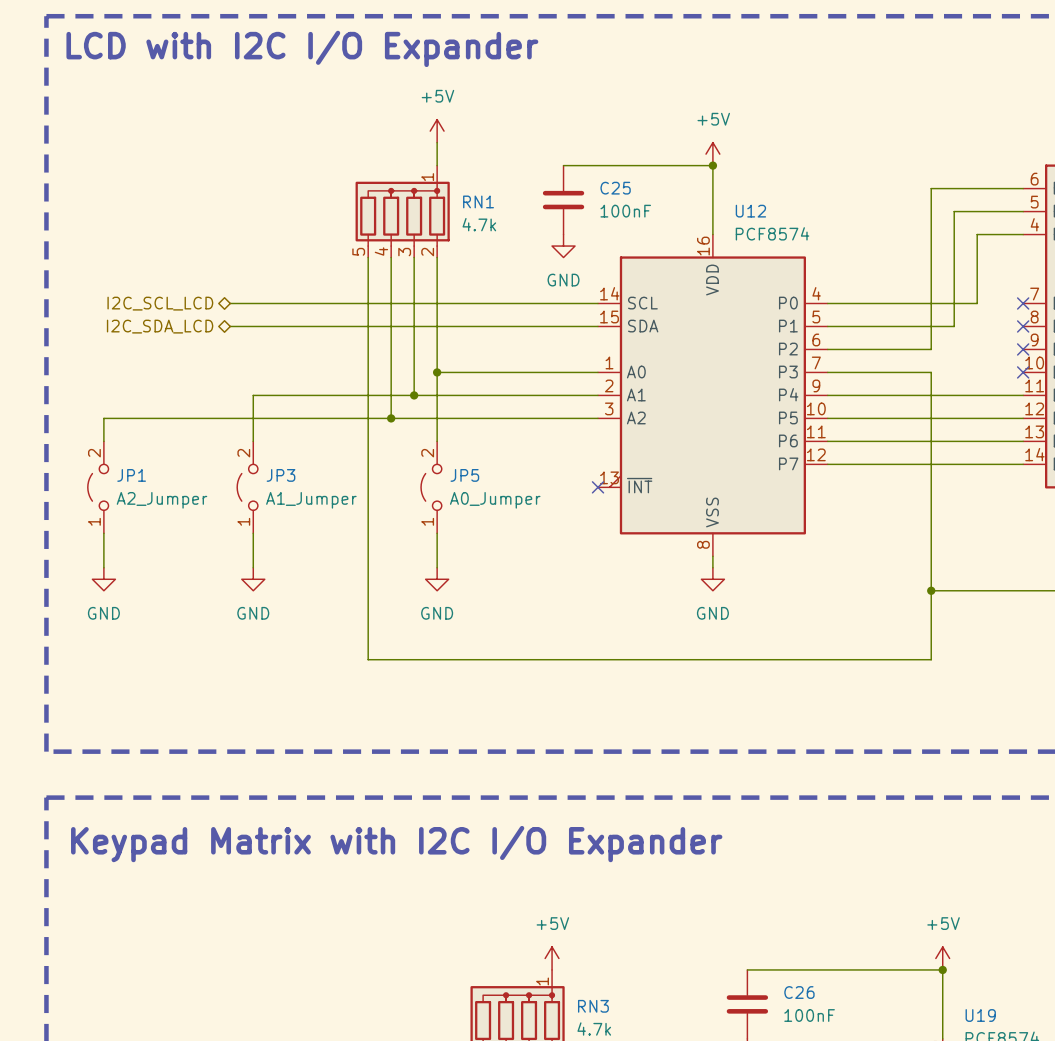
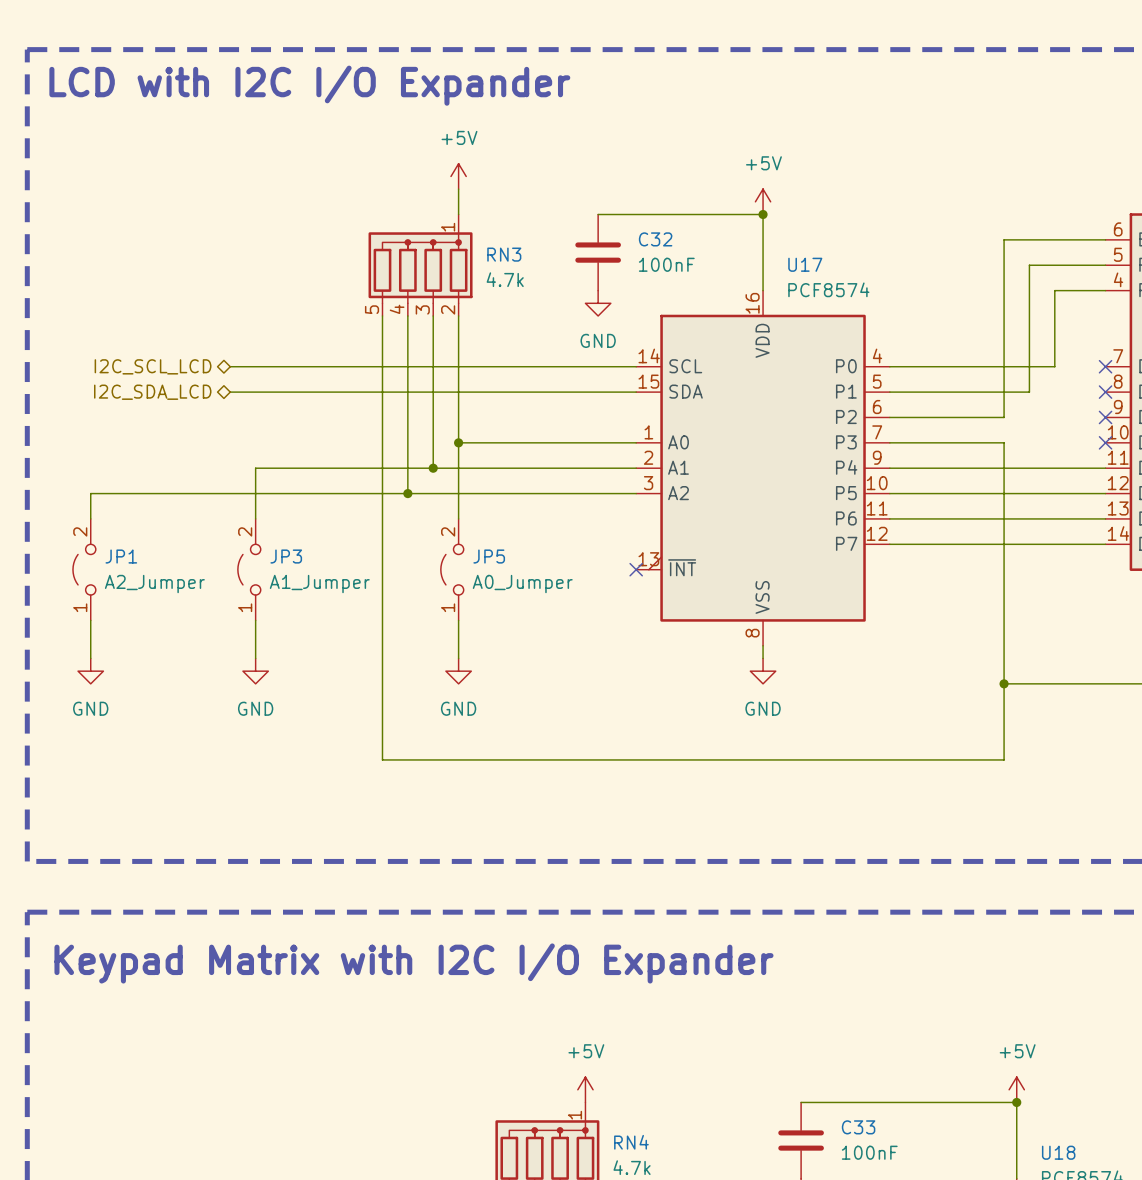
C25 name: C25 (615, 188) -> C32 (655, 239)
RN1 name: RN1 (478, 201) -> RN3 (504, 254)
U12 name: U12 (750, 211) -> U17 (805, 264)
C26 name: C26 (799, 992) -> C33 (858, 1127)
RN3 name: RN3 (593, 1006) -> RN4 (631, 1142)
U19 name: U19 (980, 1015) -> U18 (1058, 1152)

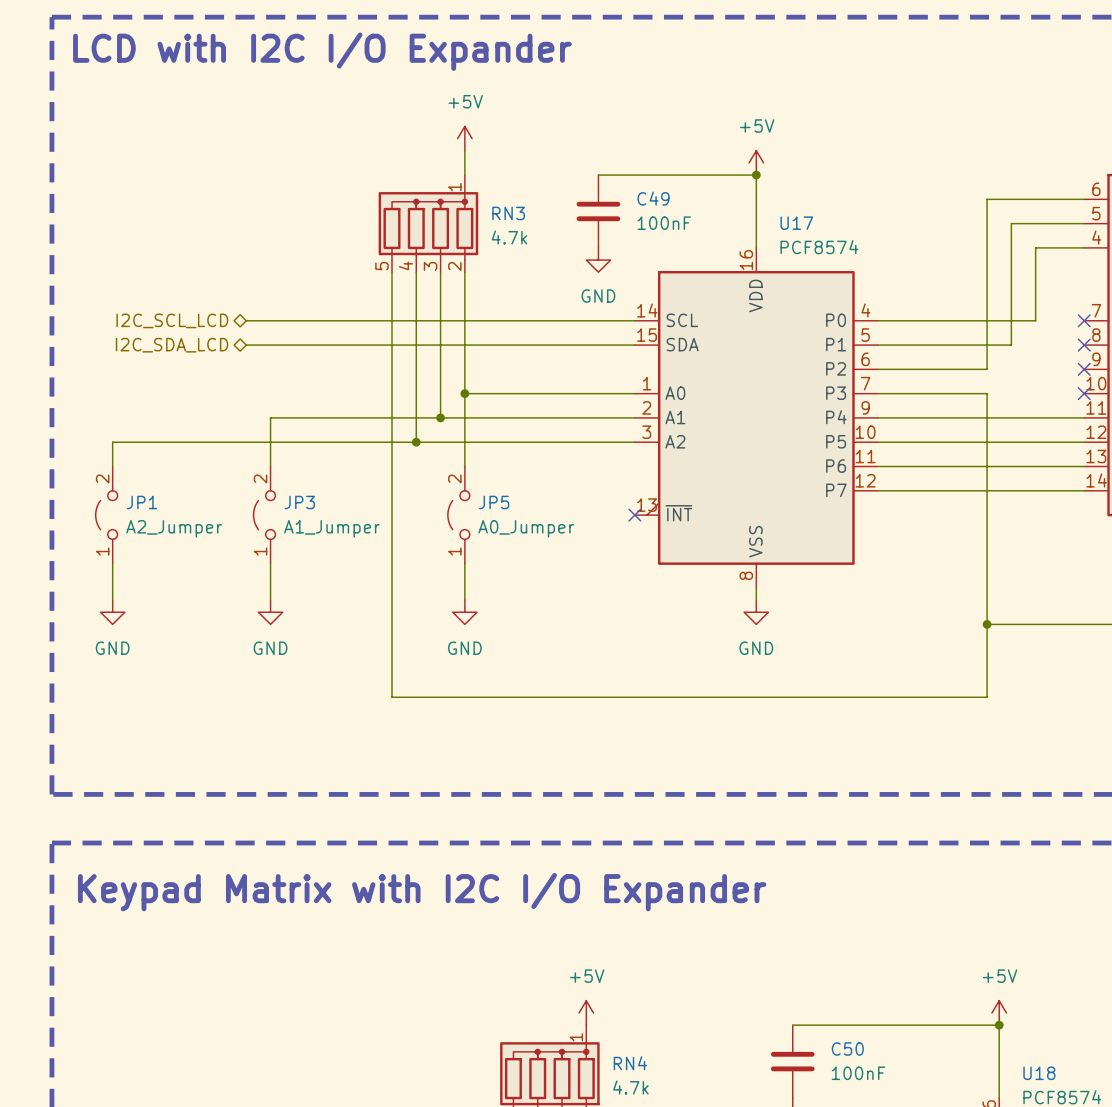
C32 name: C32 (655, 239) -> C49 (653, 198)
C33 name: C33 (858, 1127) -> C50 (847, 1048)

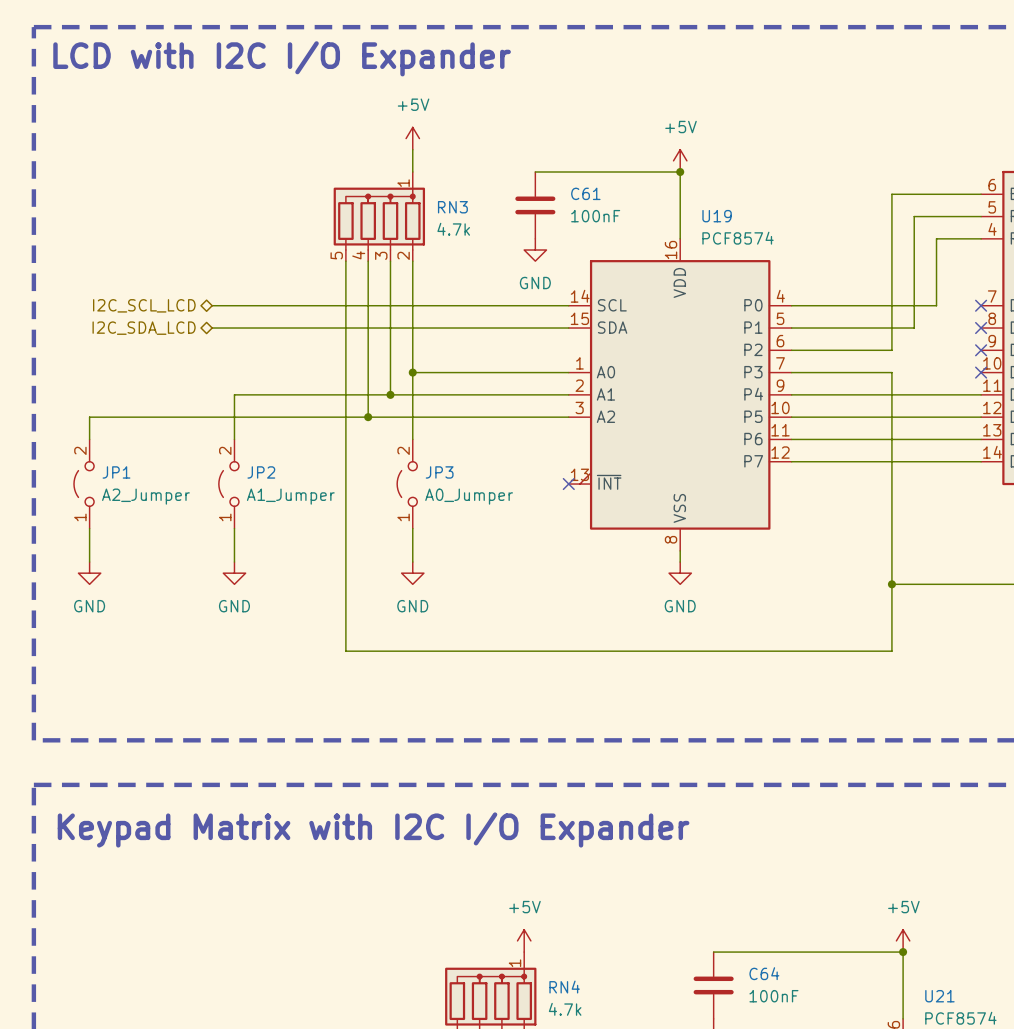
C49 name: C49 (653, 198) -> C61 (585, 193)
U17 name: U17 (796, 223) -> U19 (717, 216)
JP3 name: JP3 (299, 502) -> JP2 (261, 472)
JP5 name: JP5 (494, 502) -> JP3 (439, 472)
C50 name: C50 (847, 1048) -> C64 (764, 973)
U18 name: U18 (1039, 1073) -> U21 (939, 996)

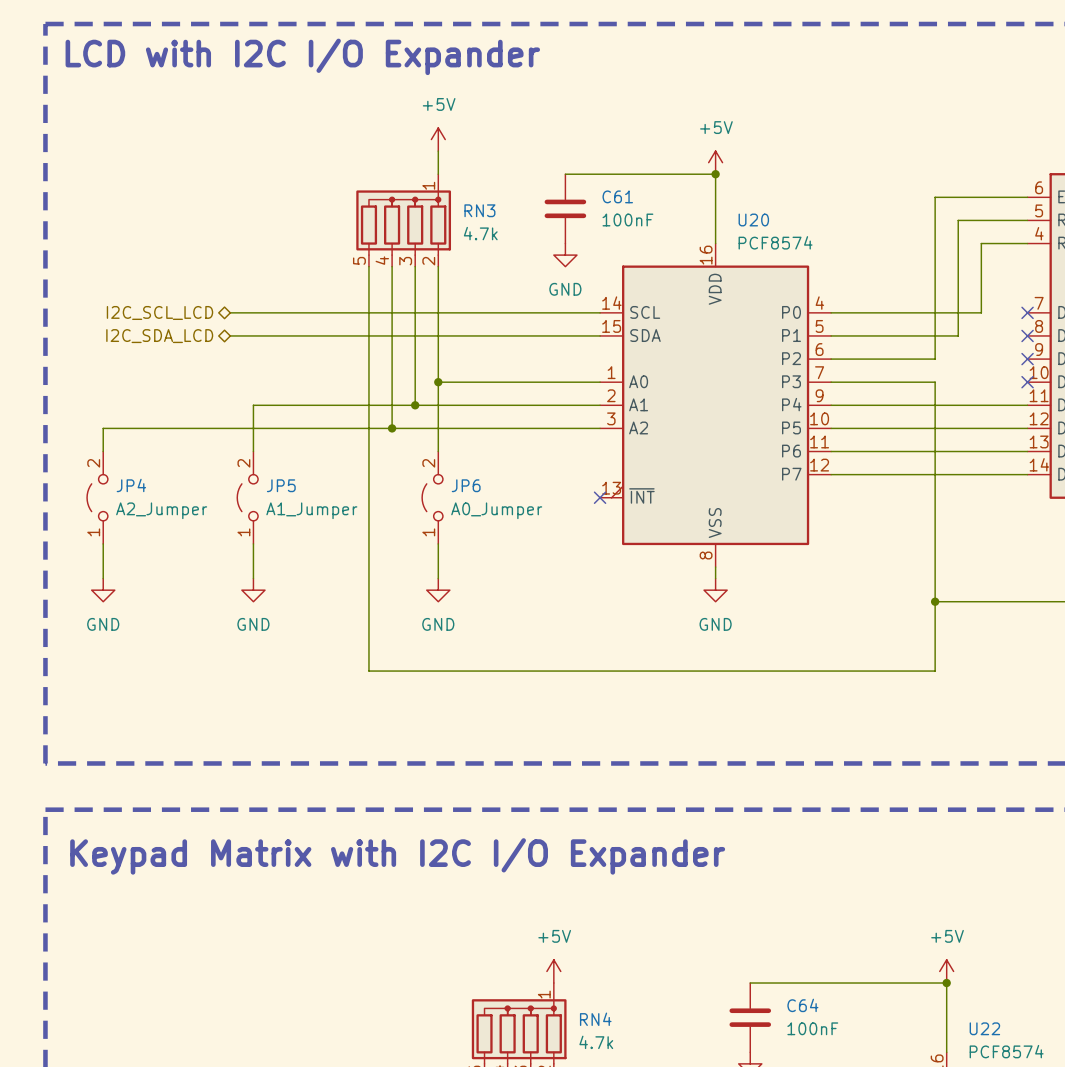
U19 name: U19 (717, 216) -> U20 (753, 220)
JP1 name: JP1 (116, 472) -> JP4 (131, 485)
JP2 name: JP2 (261, 472) -> JP5 (281, 485)
JP3 name: JP3 (439, 472) -> JP6 (466, 485)
U21 name: U21 (939, 996) -> U22 (984, 1028)

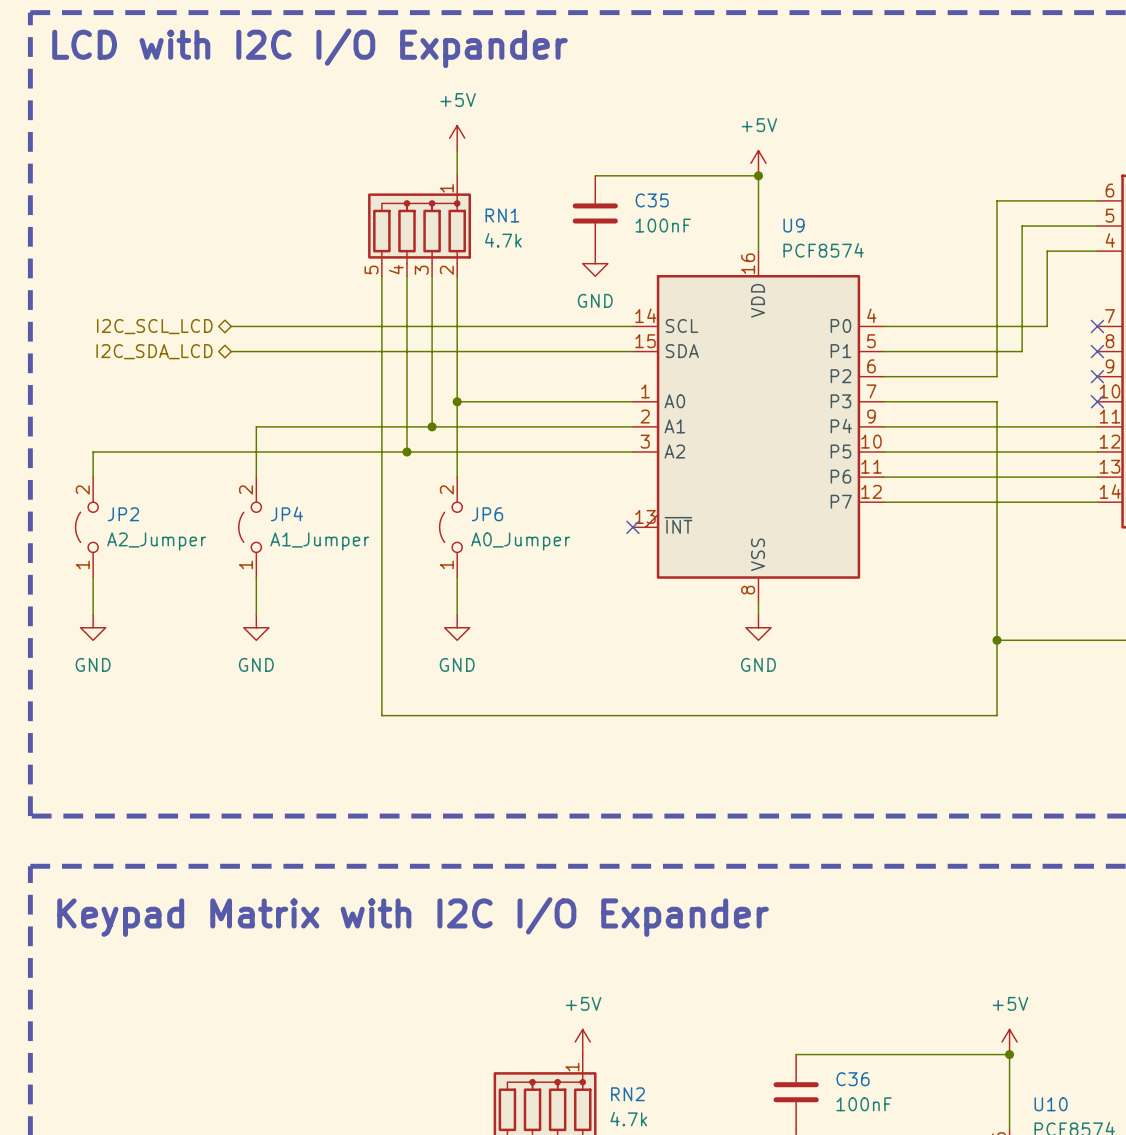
C61 name: C61 (617, 196) -> C35 (652, 200)
RN3 name: RN3 (479, 210) -> RN1 (502, 215)
U20 name: U20 (753, 220) -> U9 (794, 225)
JP4 name: JP4 (131, 485) -> JP2 (123, 514)
JP5 name: JP5 (281, 485) -> JP4 (286, 513)
C64 name: C64 (802, 1005) -> C36 (853, 1079)
RN4 name: RN4 (595, 1019) -> RN2 (627, 1094)
U22 name: U22 (984, 1028) -> U10 (1051, 1104)

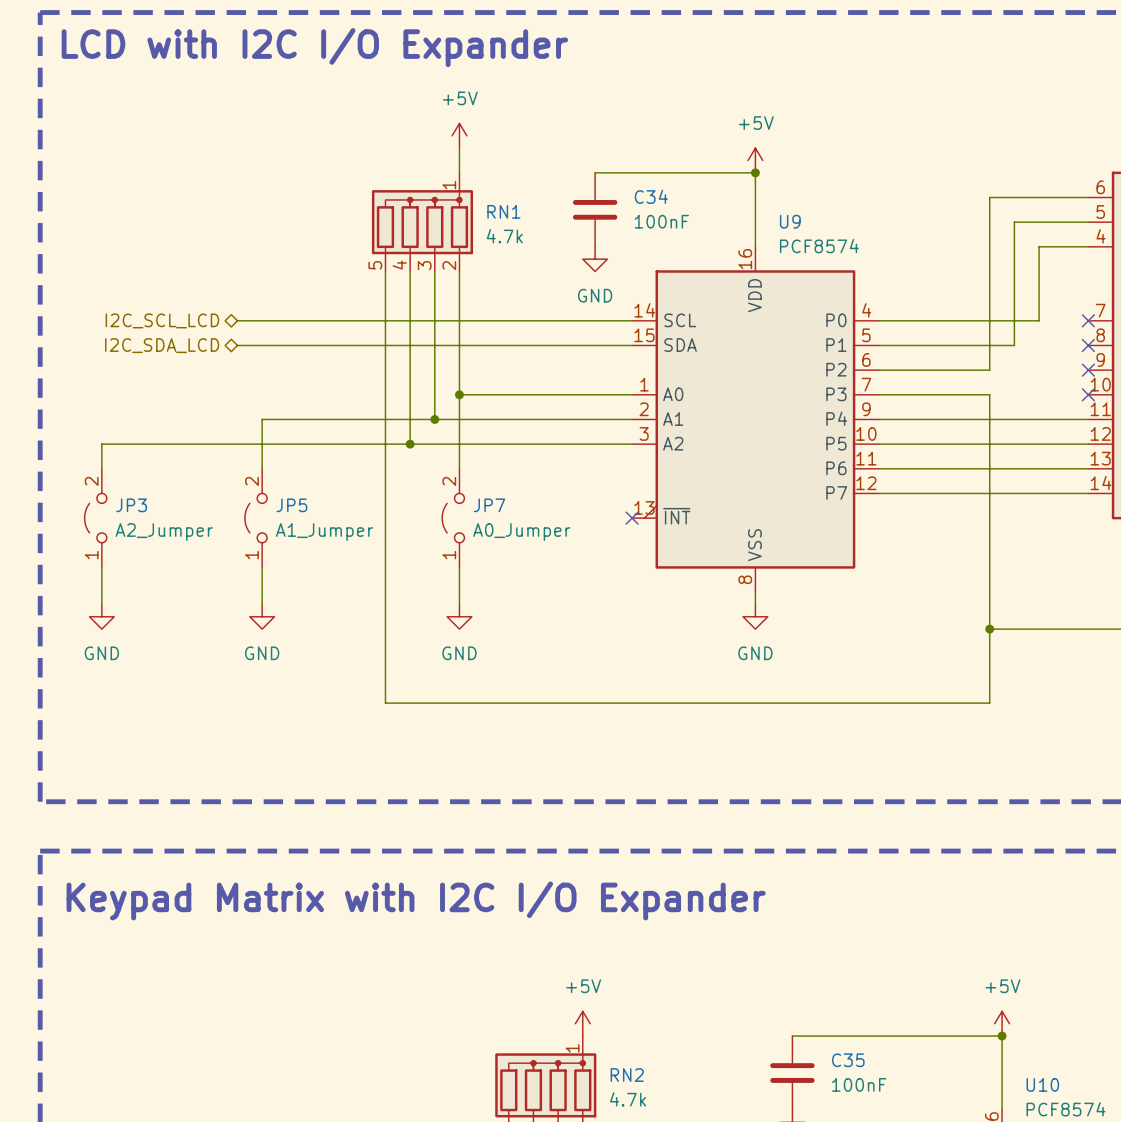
C35 name: C35 (652, 200) -> C34 (651, 196)
JP4 name: JP4 (286, 513) -> JP5 (291, 505)
JP2 name: JP2 (123, 514) -> JP3 (131, 505)
JP6 name: JP6 (487, 514) -> JP7 (489, 505)
C36 name: C36 (853, 1079) -> C35 (848, 1060)

